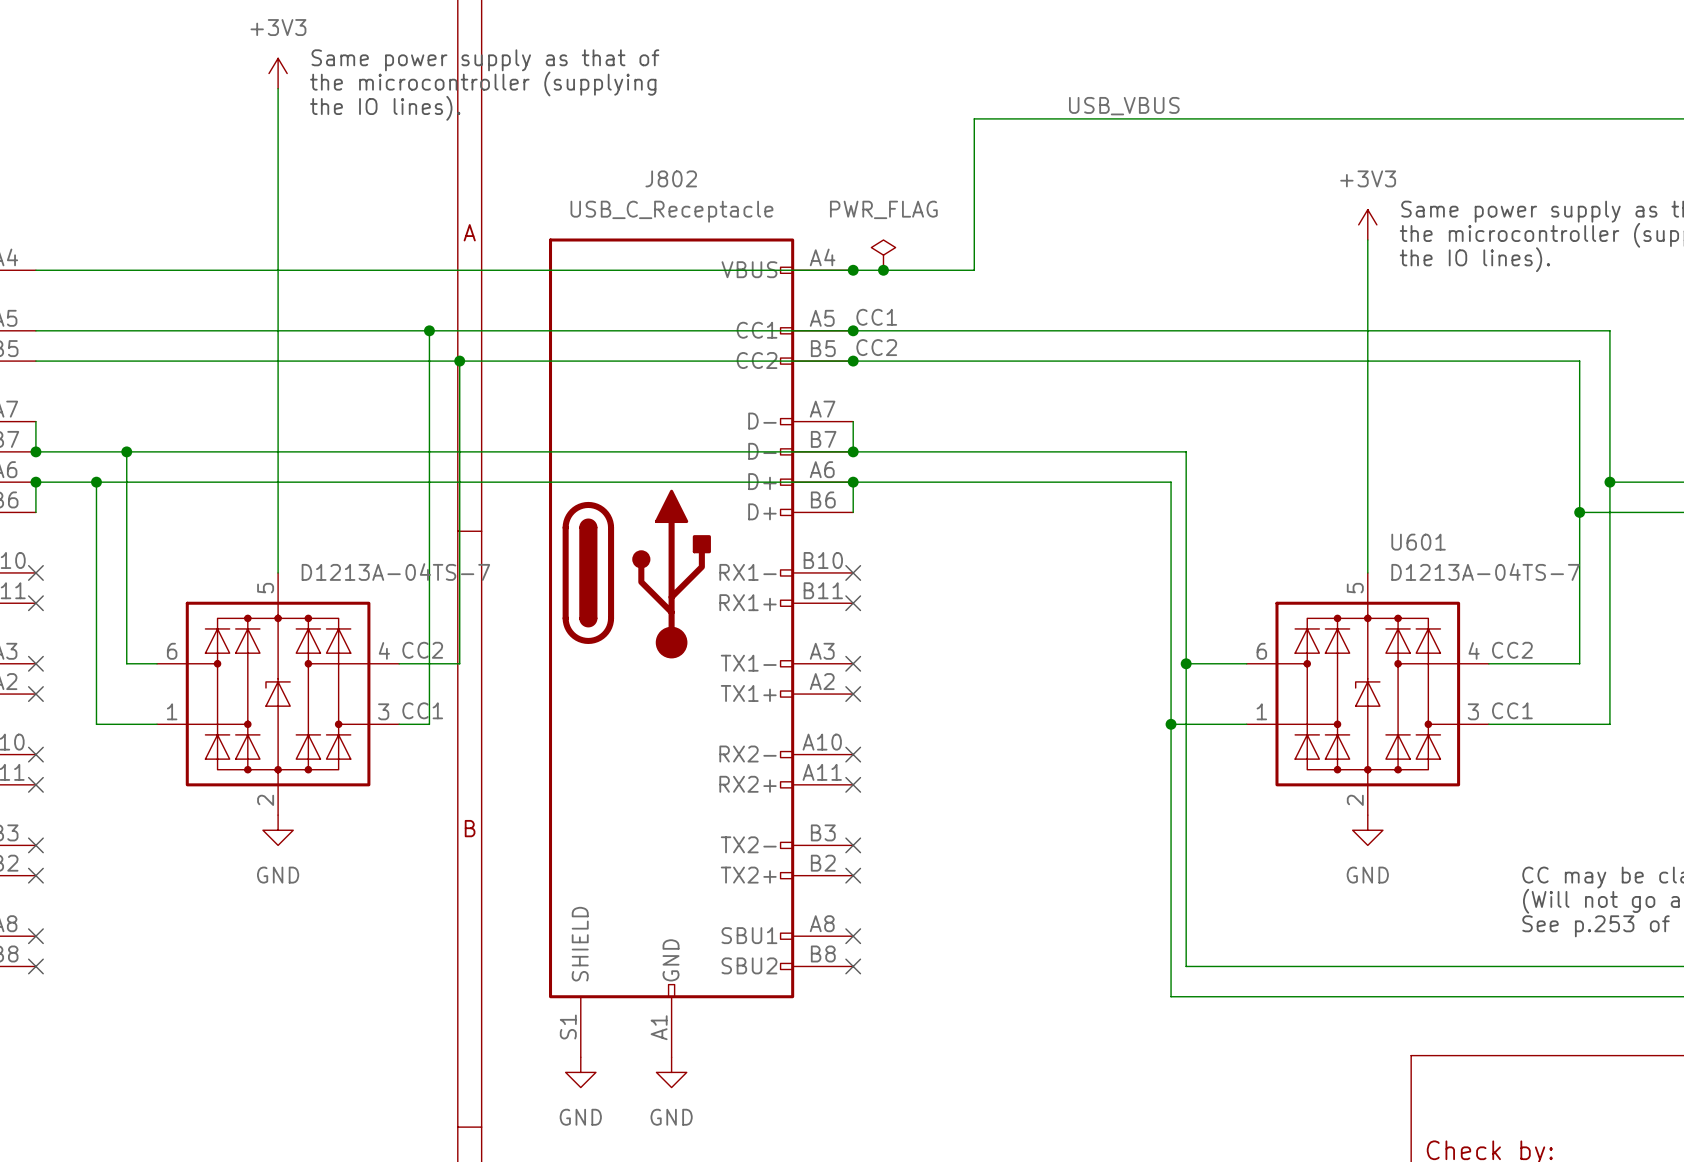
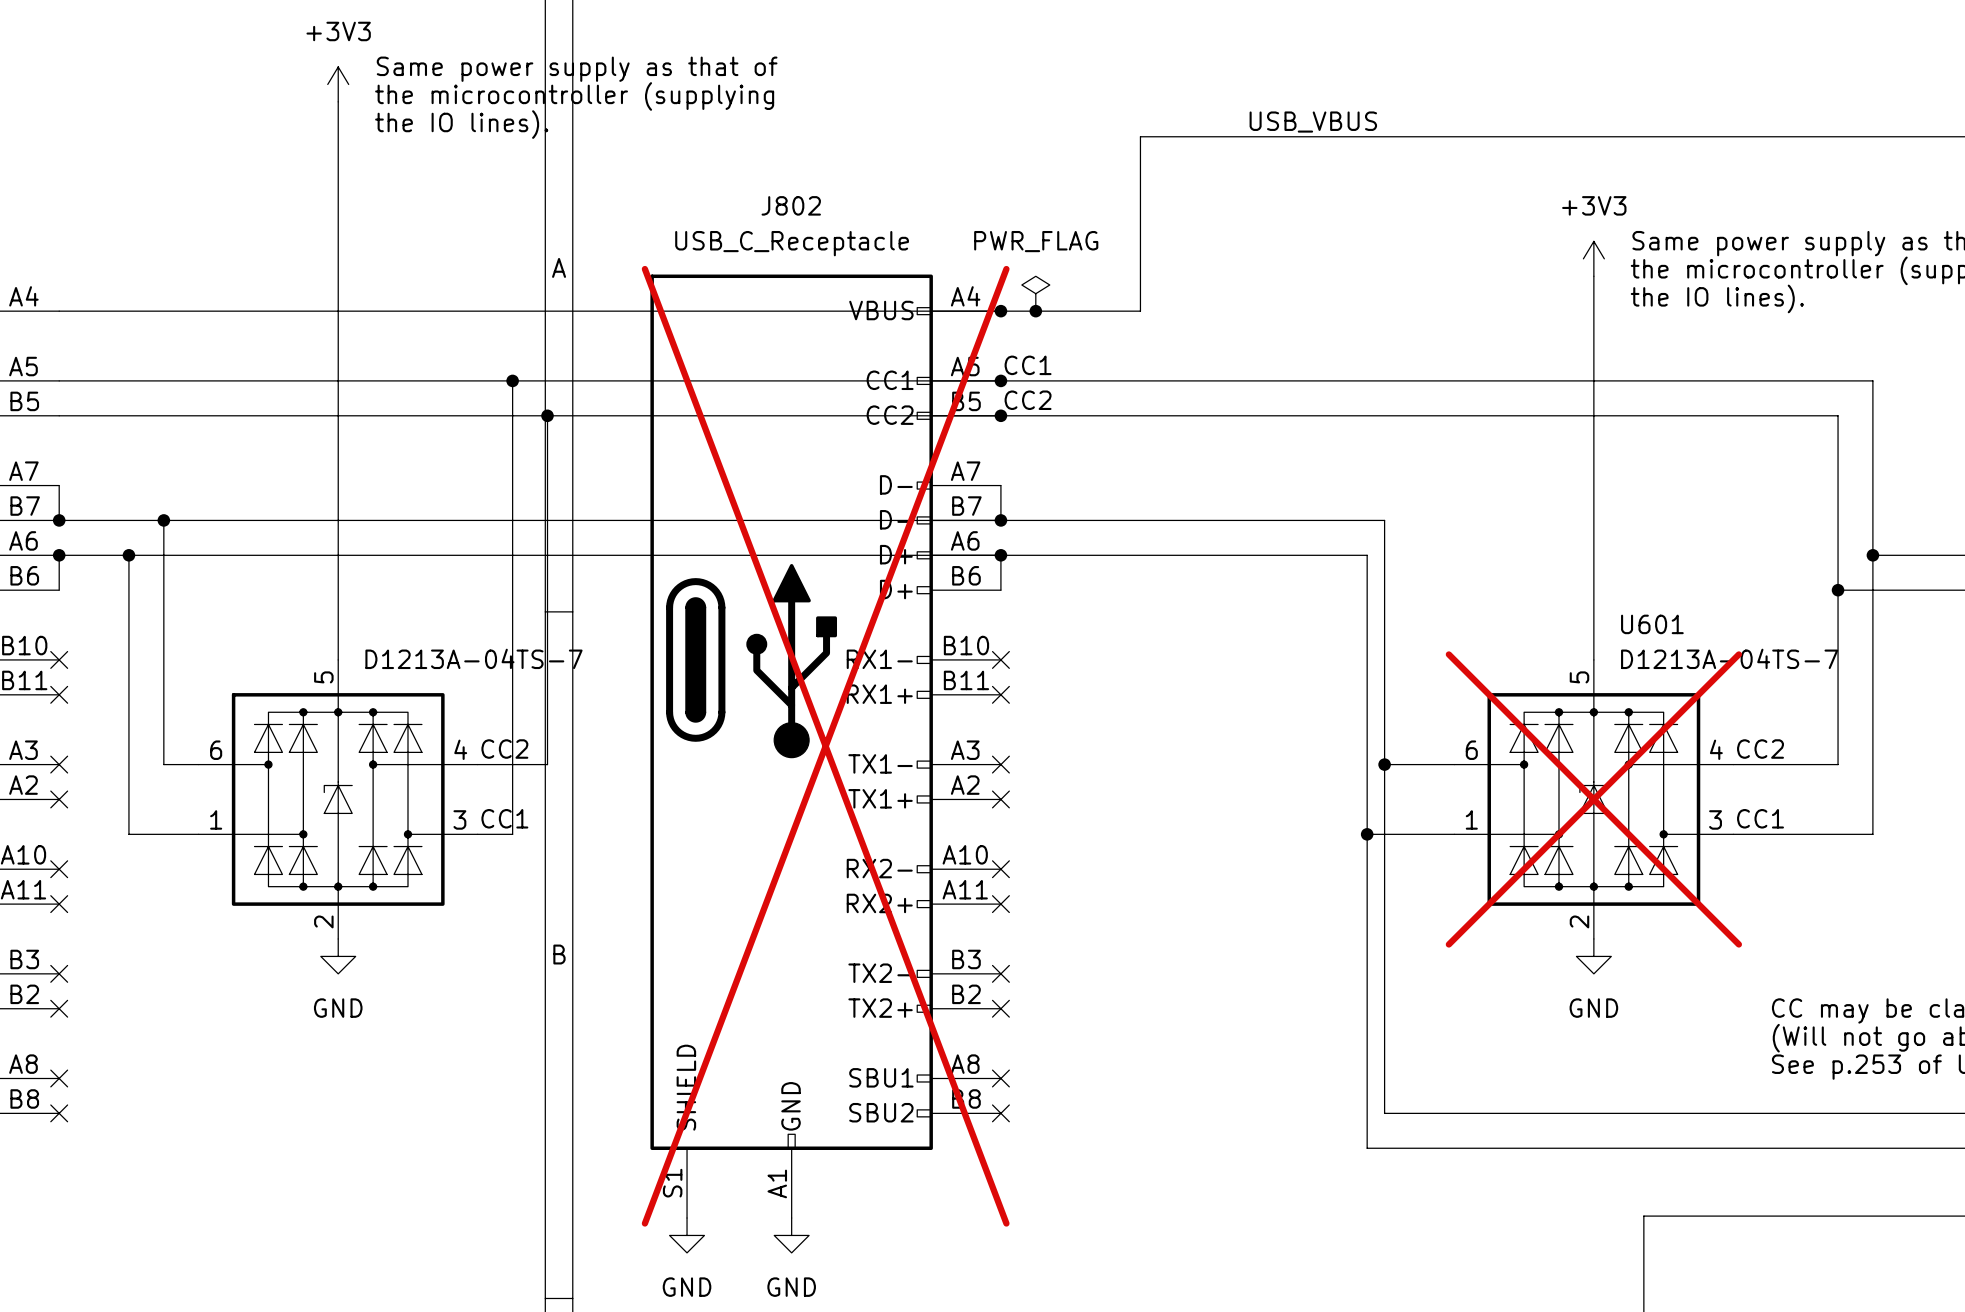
J802 do-not-place cross: none -> (825, 746)
U601 do-not-place cross: none -> (1593, 799)

